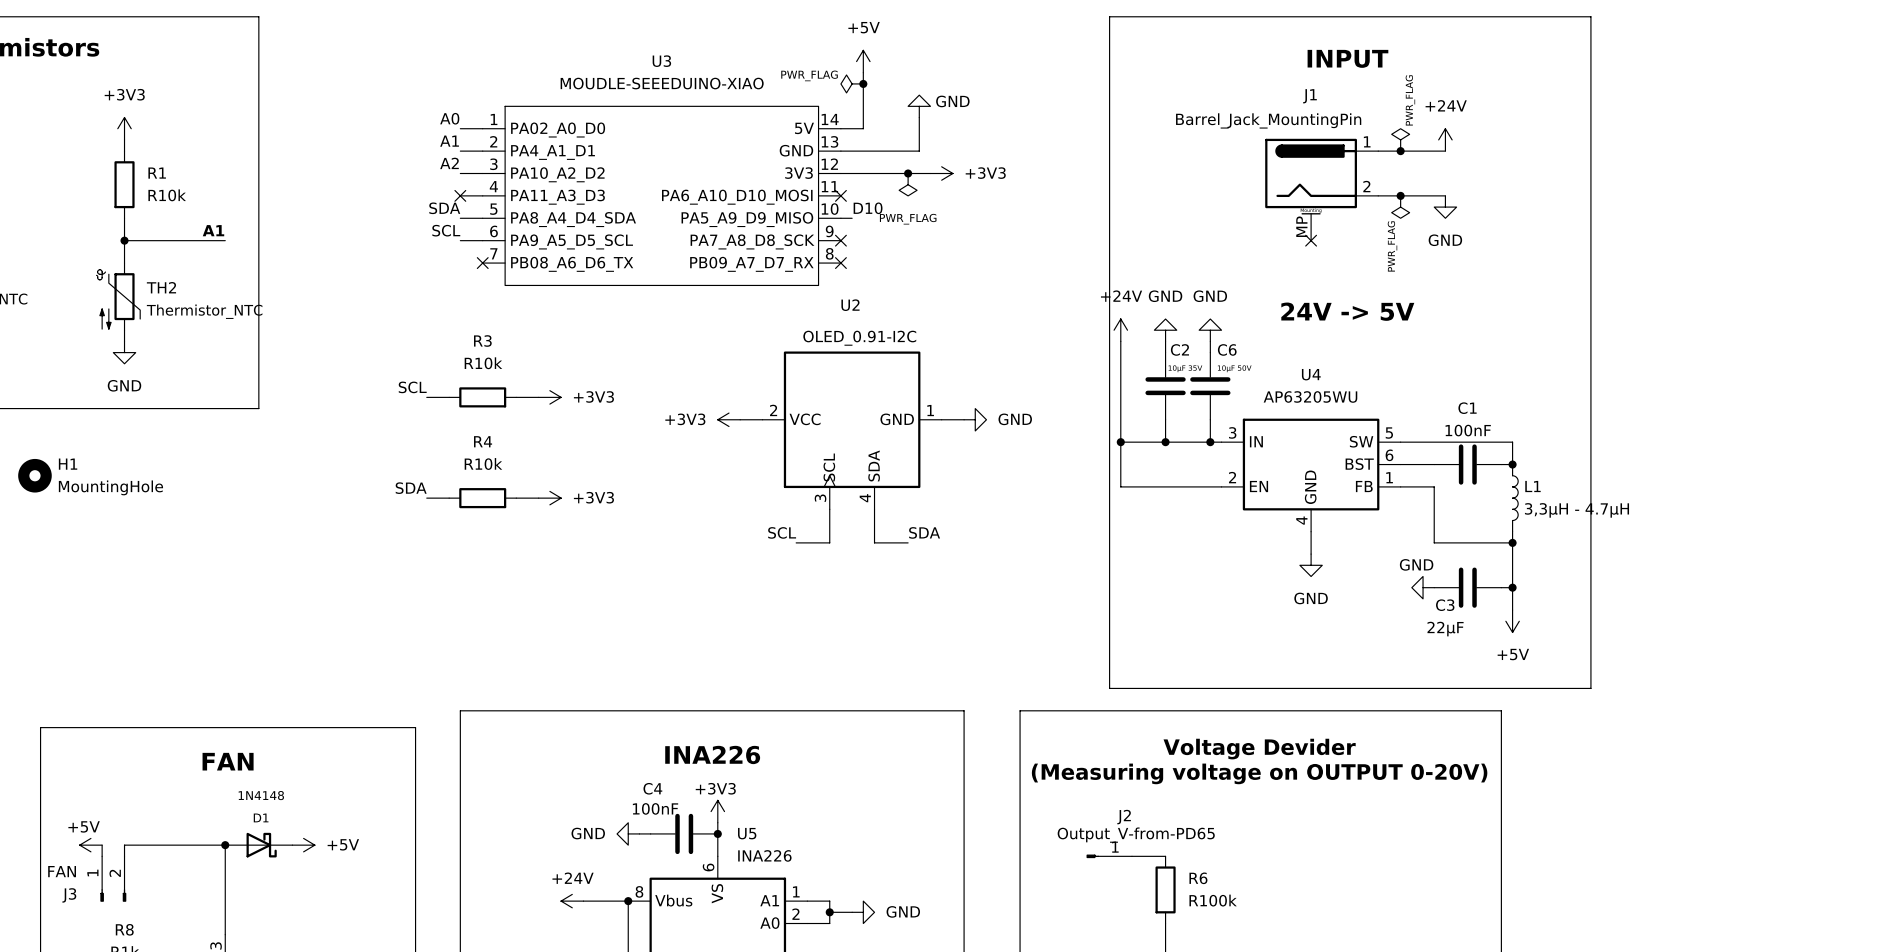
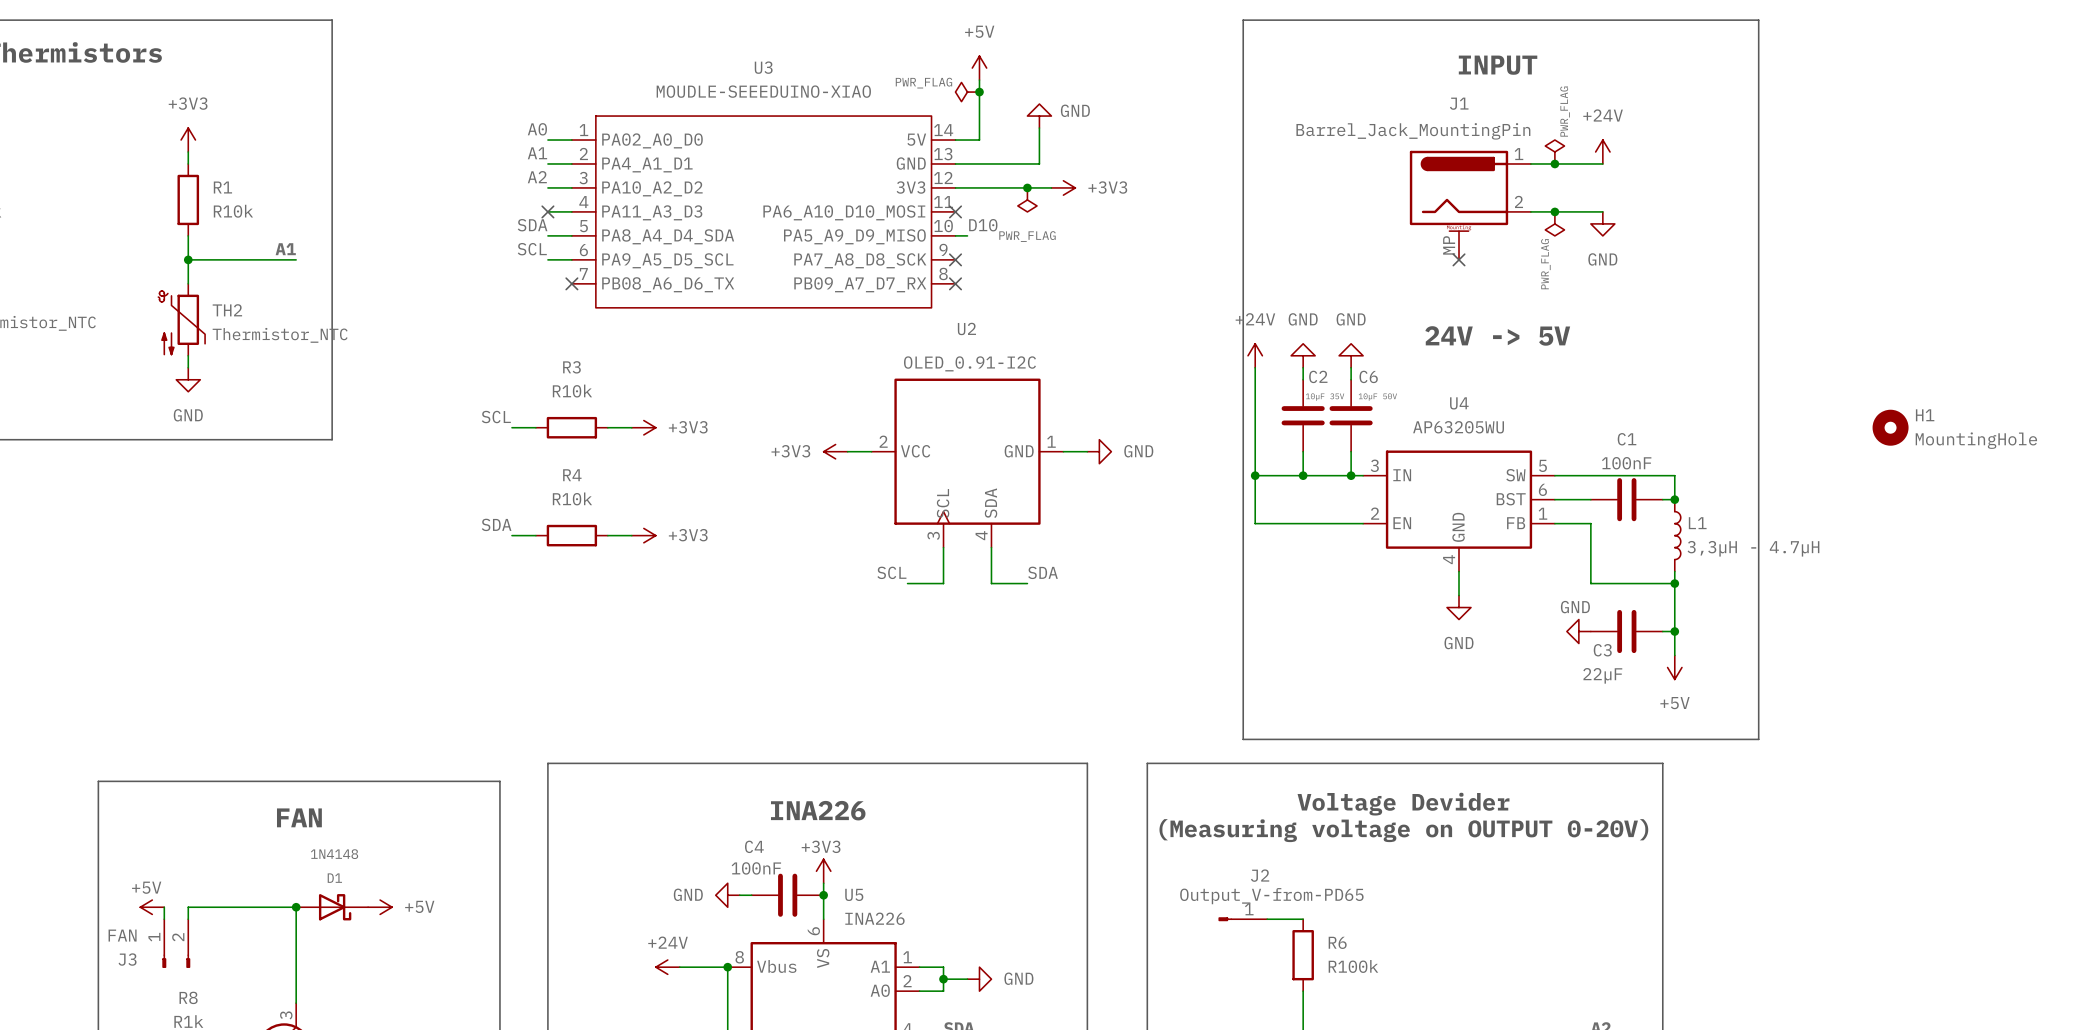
H1 position: (34, 475) -> (1890, 427)

